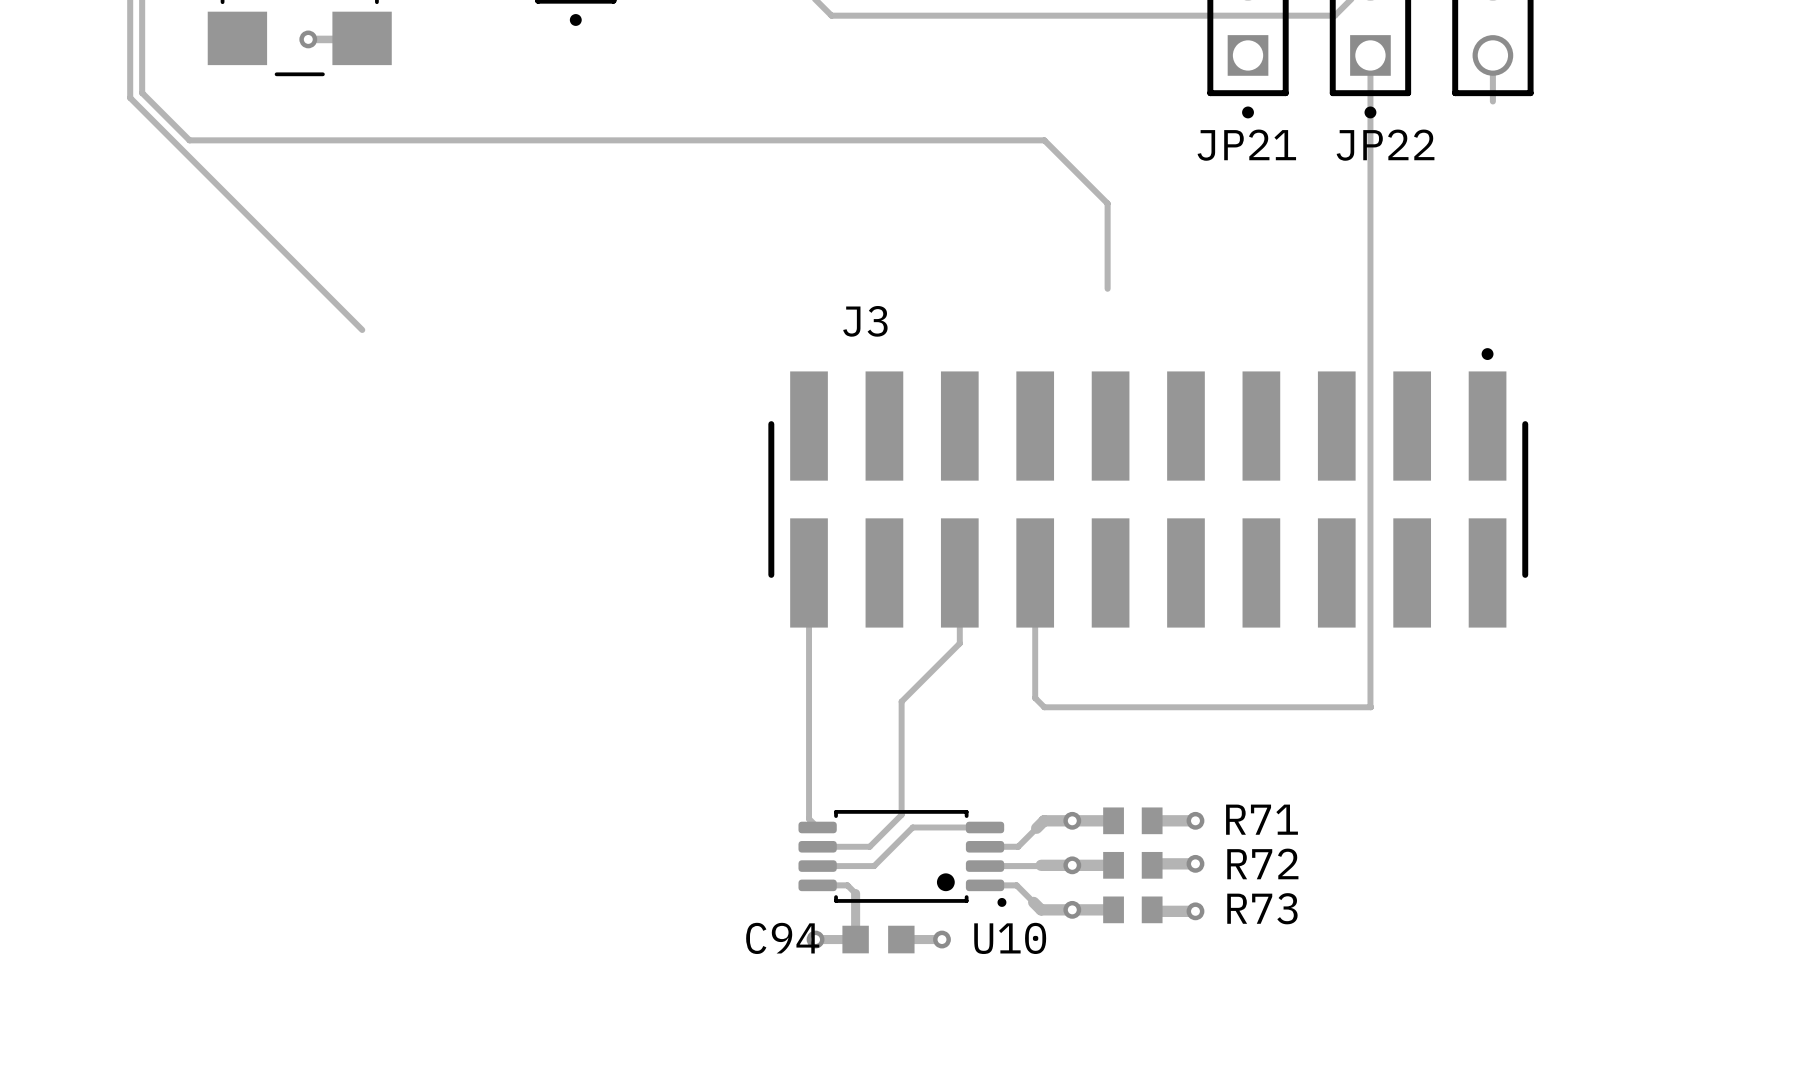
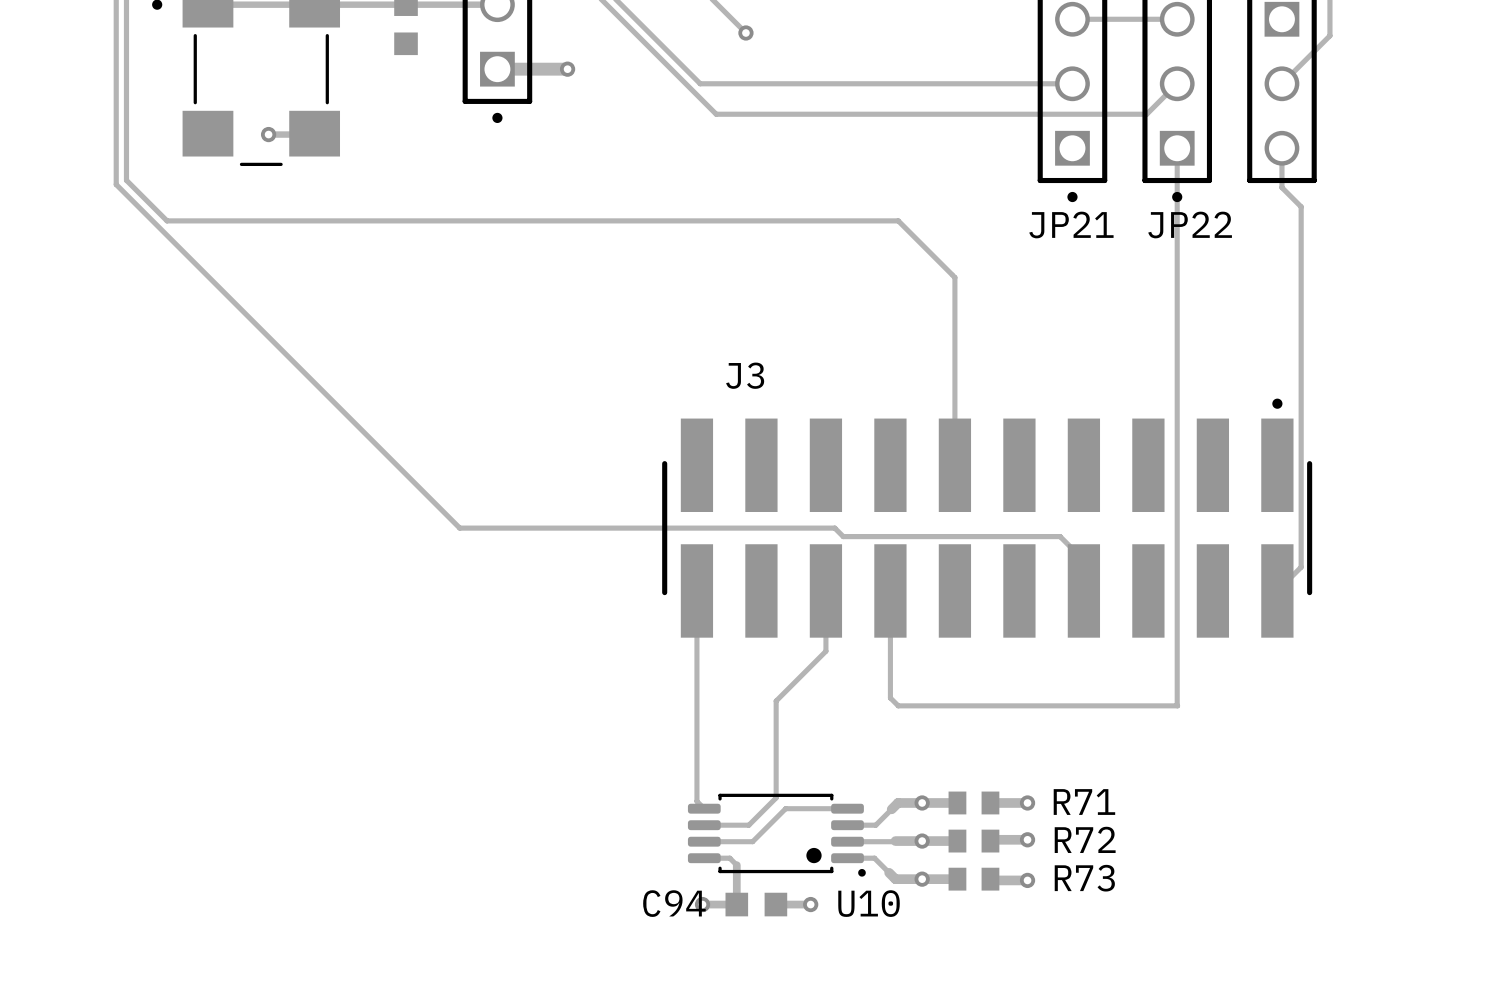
track: none -> (1281, 187) (1301, 206) (1301, 567) (1277, 590)
track: (1107, 203) (1107, 288) -> (952, 274) (954, 277) (954, 465)
track: none -> (314, 383) (459, 528) (834, 528) (843, 536) (1060, 536) (1083, 560) (1083, 590) (1083, 574) (1076, 566)

